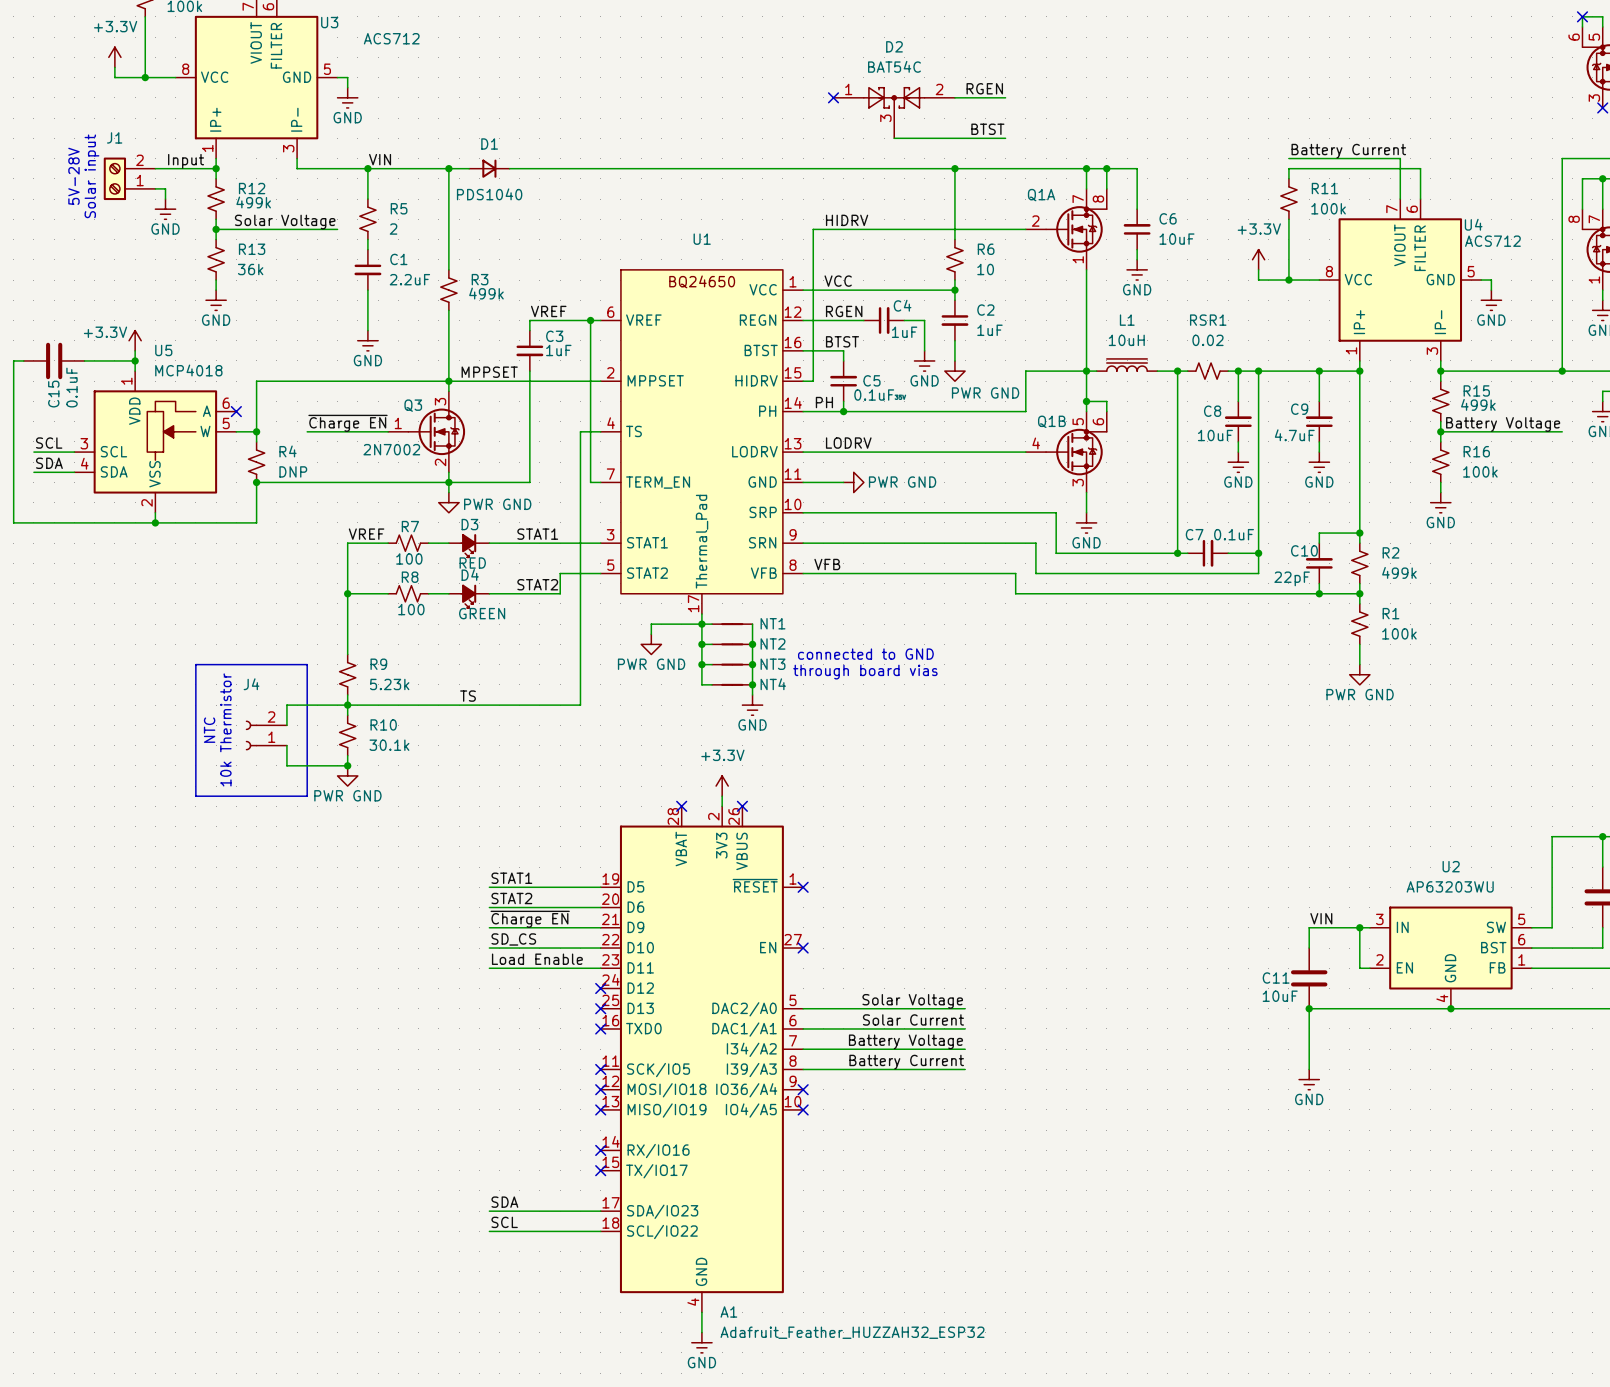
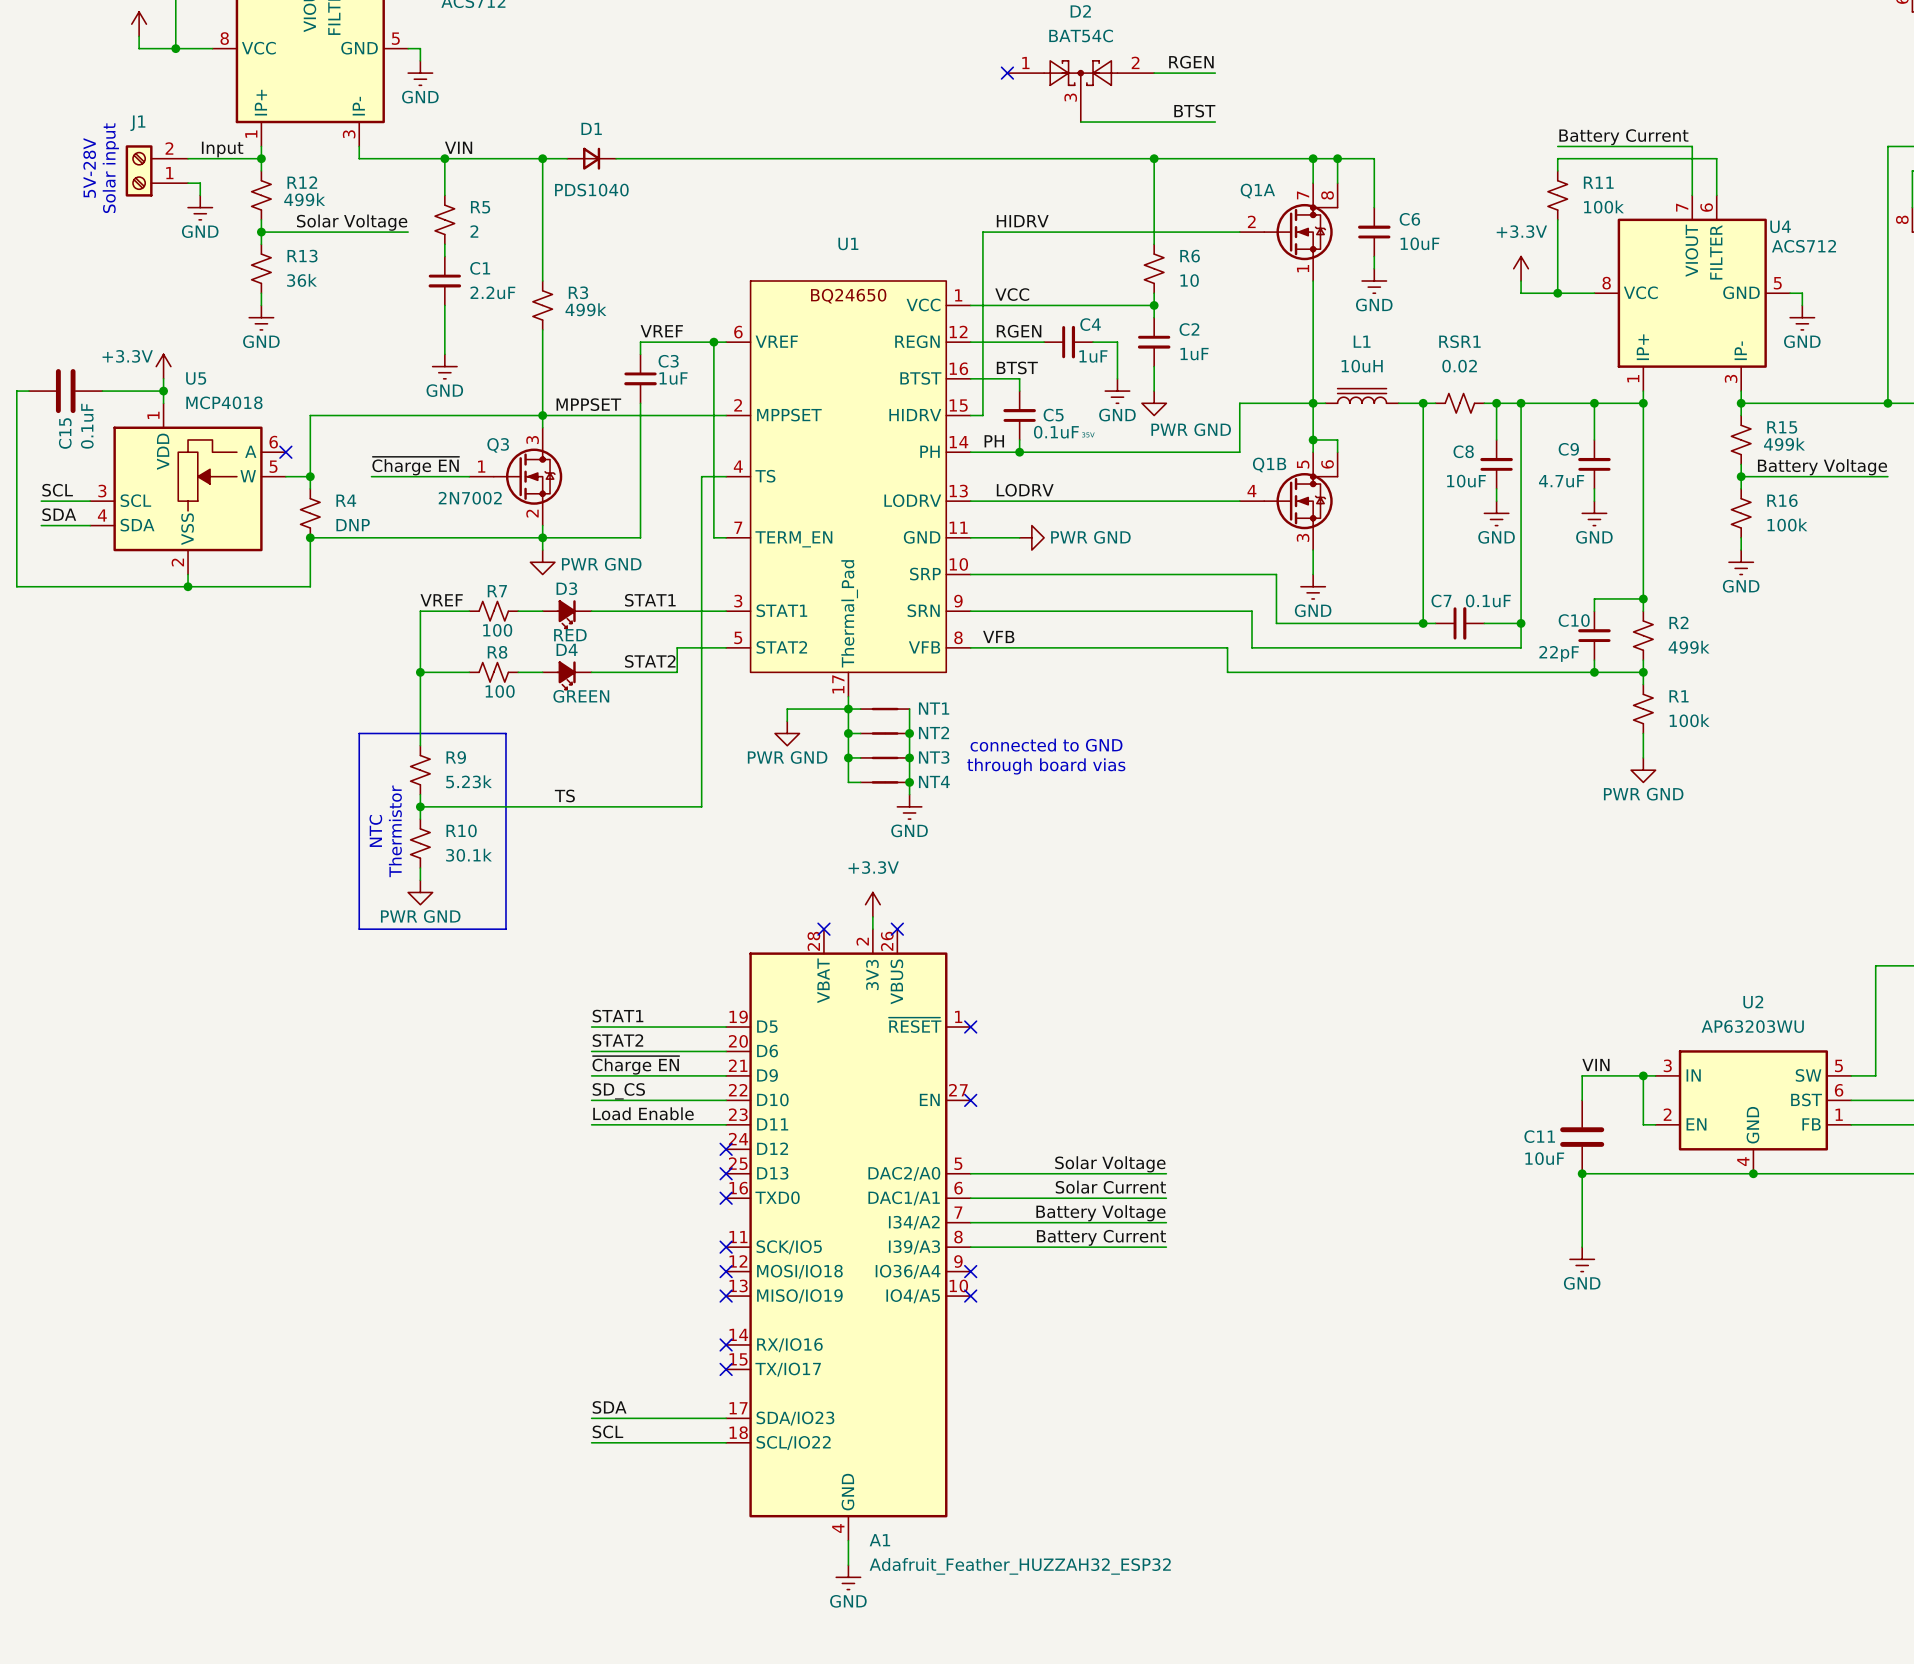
line: none -> (359, 733) (505, 733) (505, 929) (359, 929) (359, 733)
line: (195, 664) (307, 664) (307, 796) (195, 796) (195, 664) -> none
wire: (347, 705) (286, 705) (286, 725) -> none
text: none -> Thermistor (395, 831)
text: 10k Thermistor (225, 729) -> none
text position: NTC (209, 730) -> NTC (375, 830)
J4: (266, 735) -> none
wire: (286, 745) (286, 765) (347, 765) -> none
junction: (347, 765) -> none

